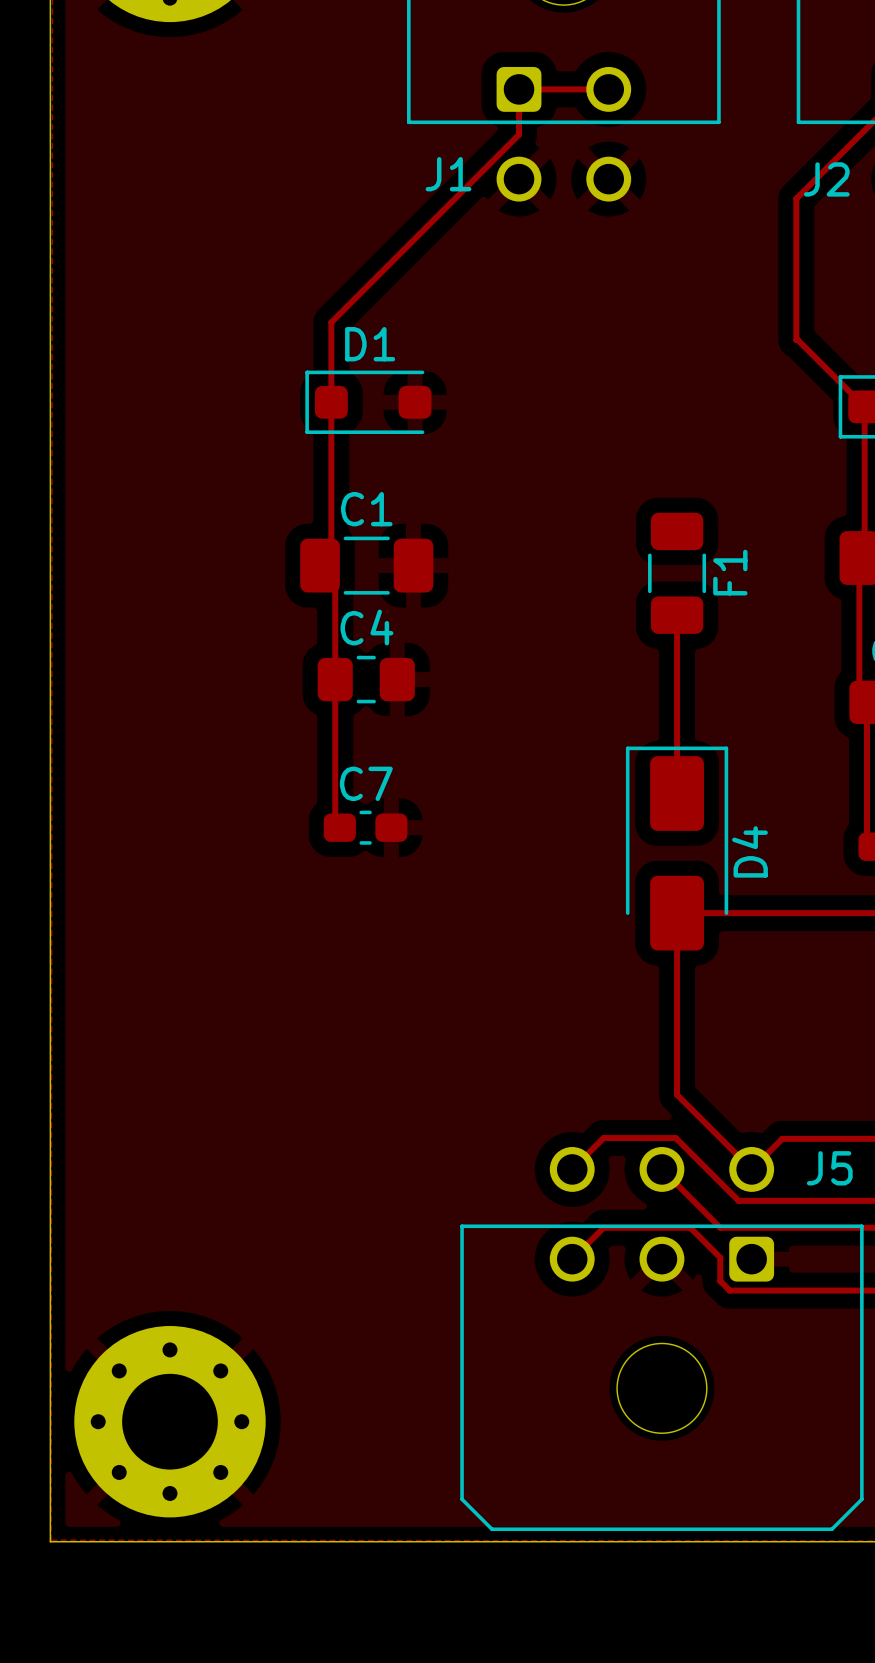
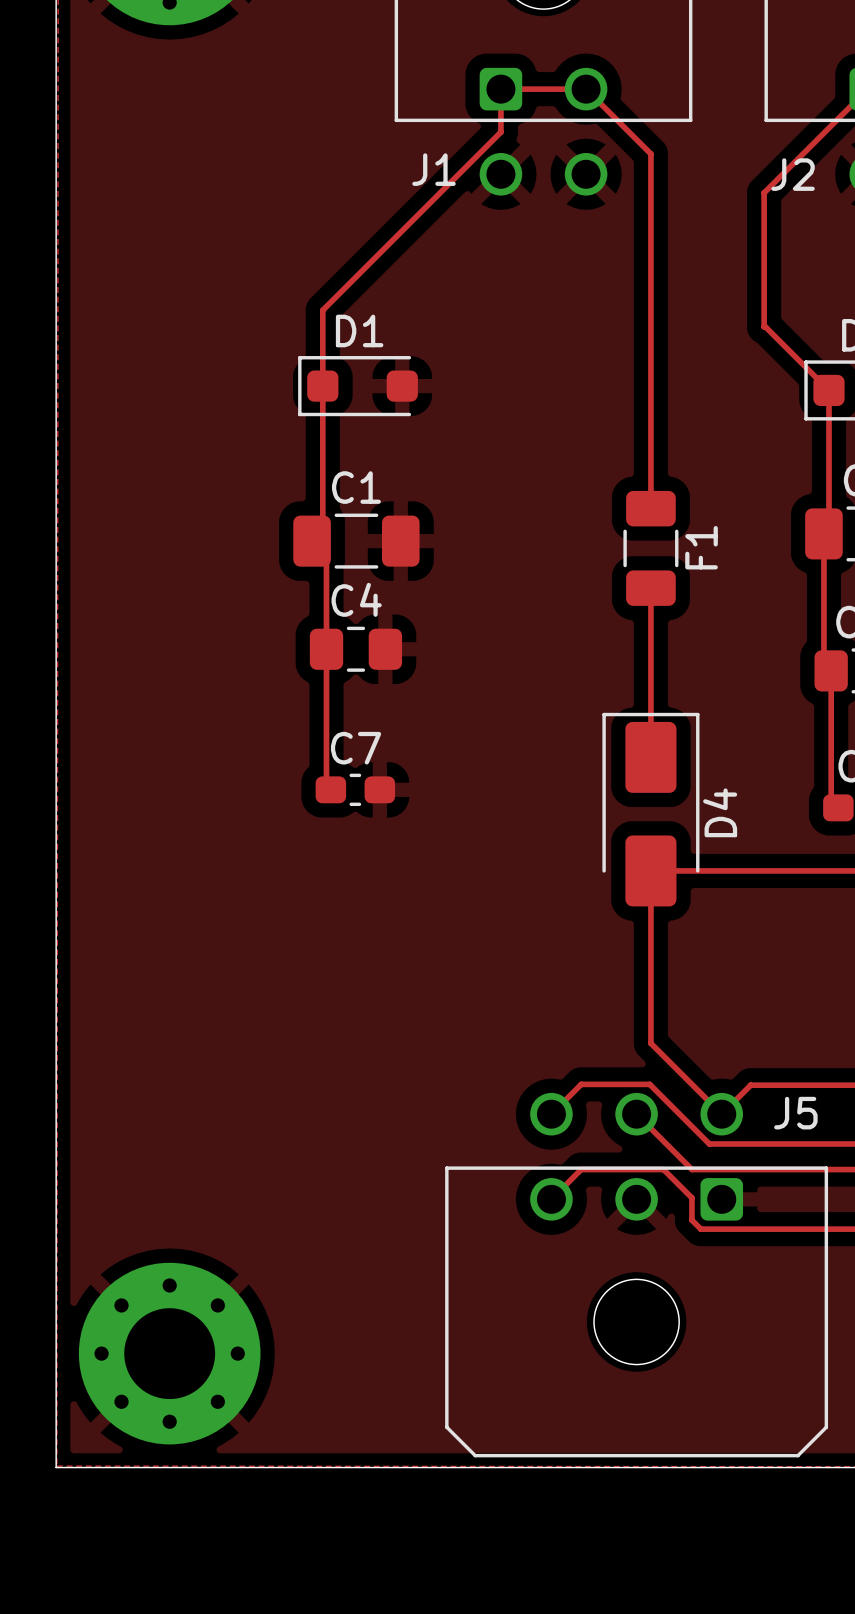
track: none -> (586, 89) (650, 153) (650, 508)

